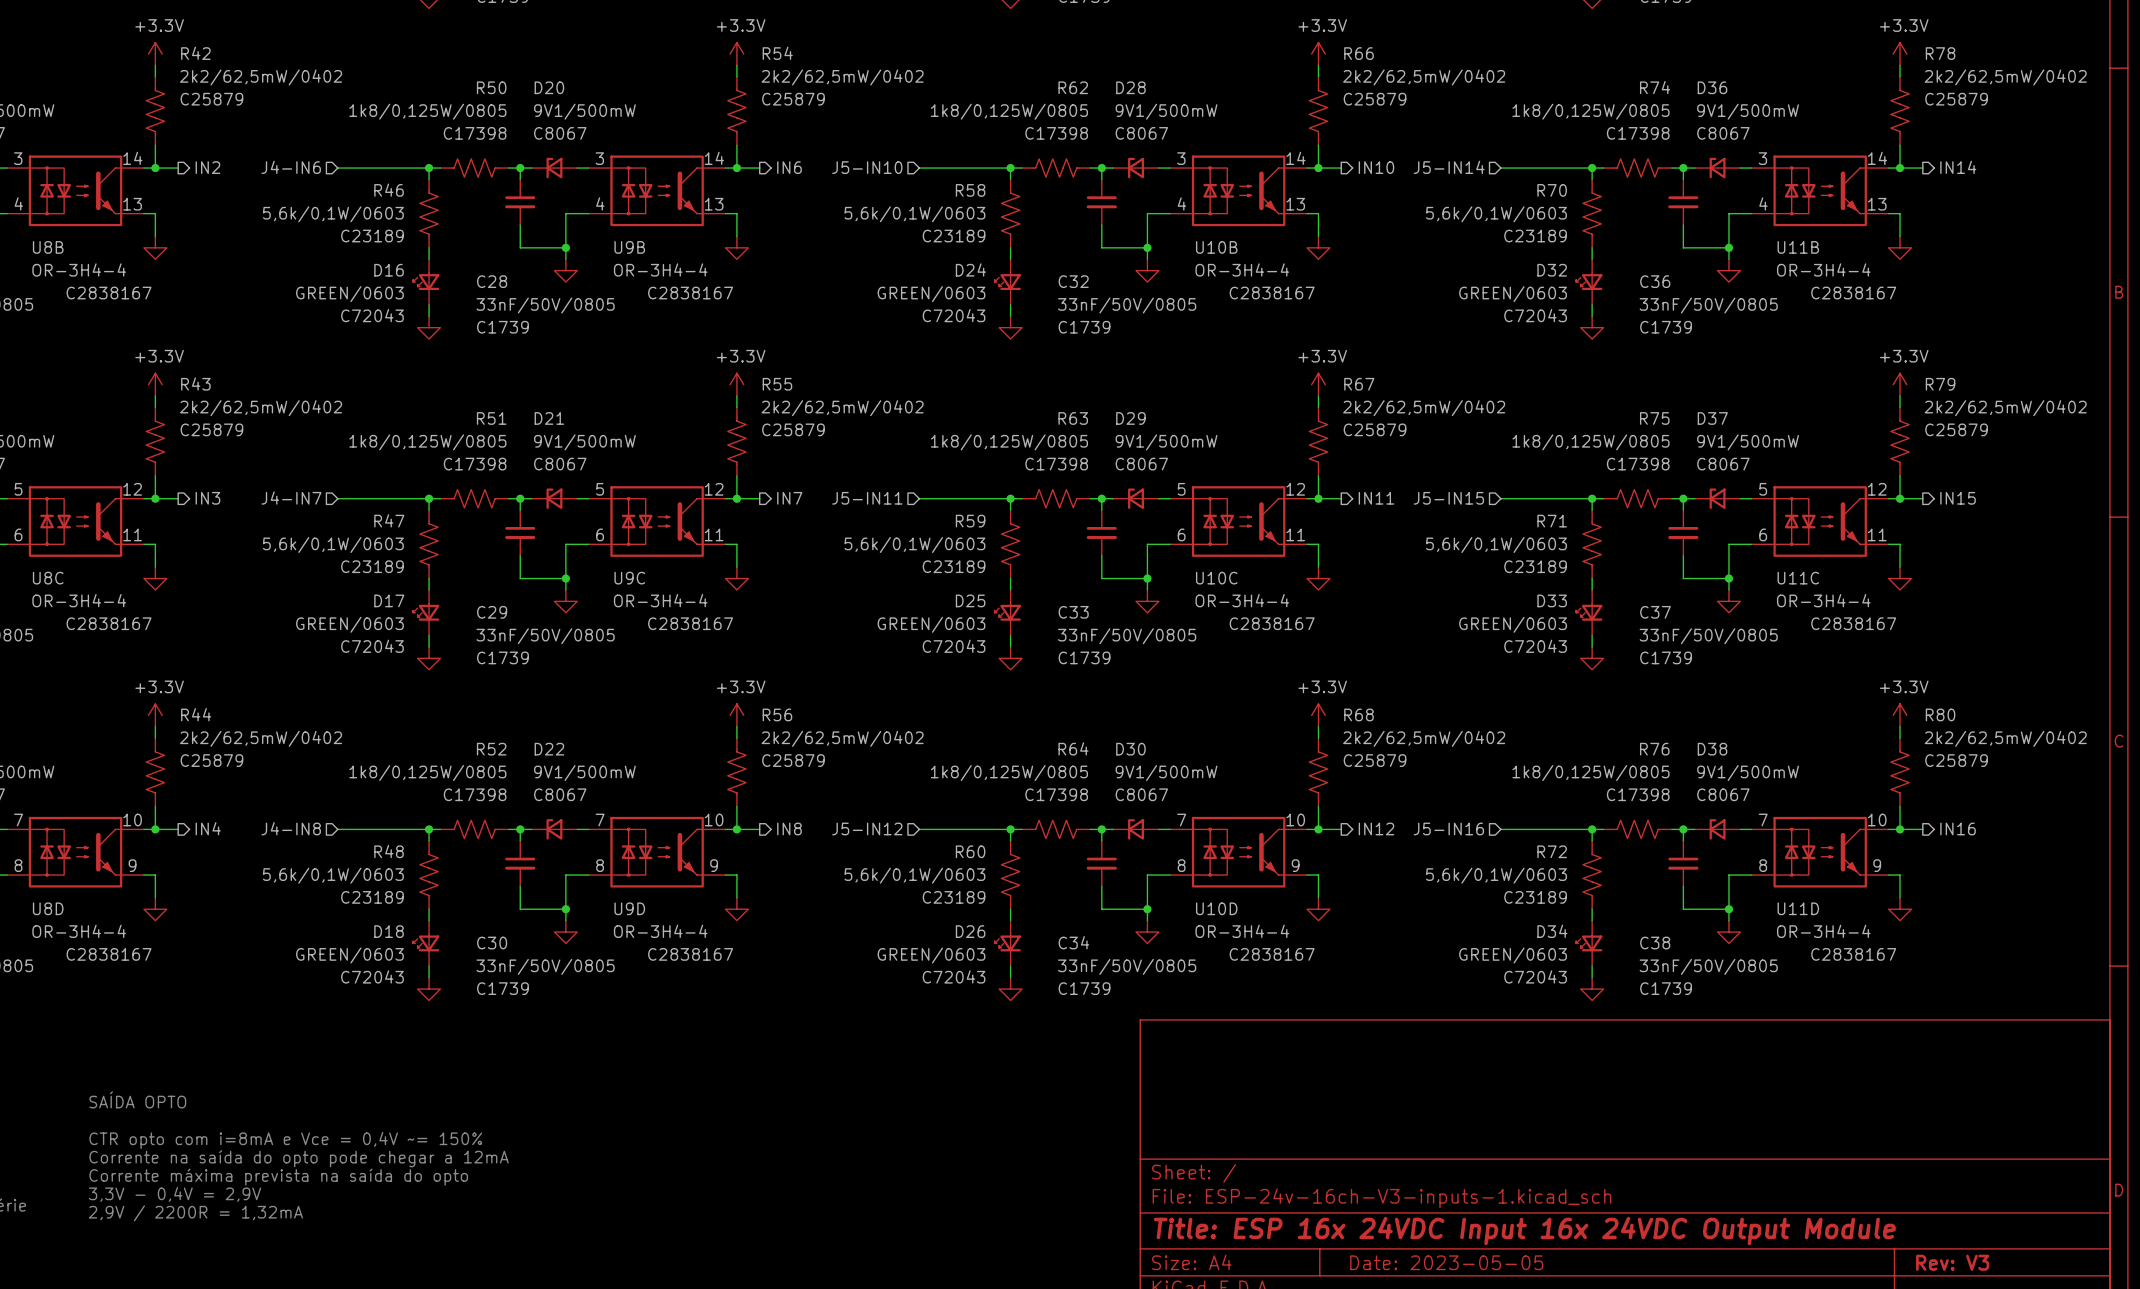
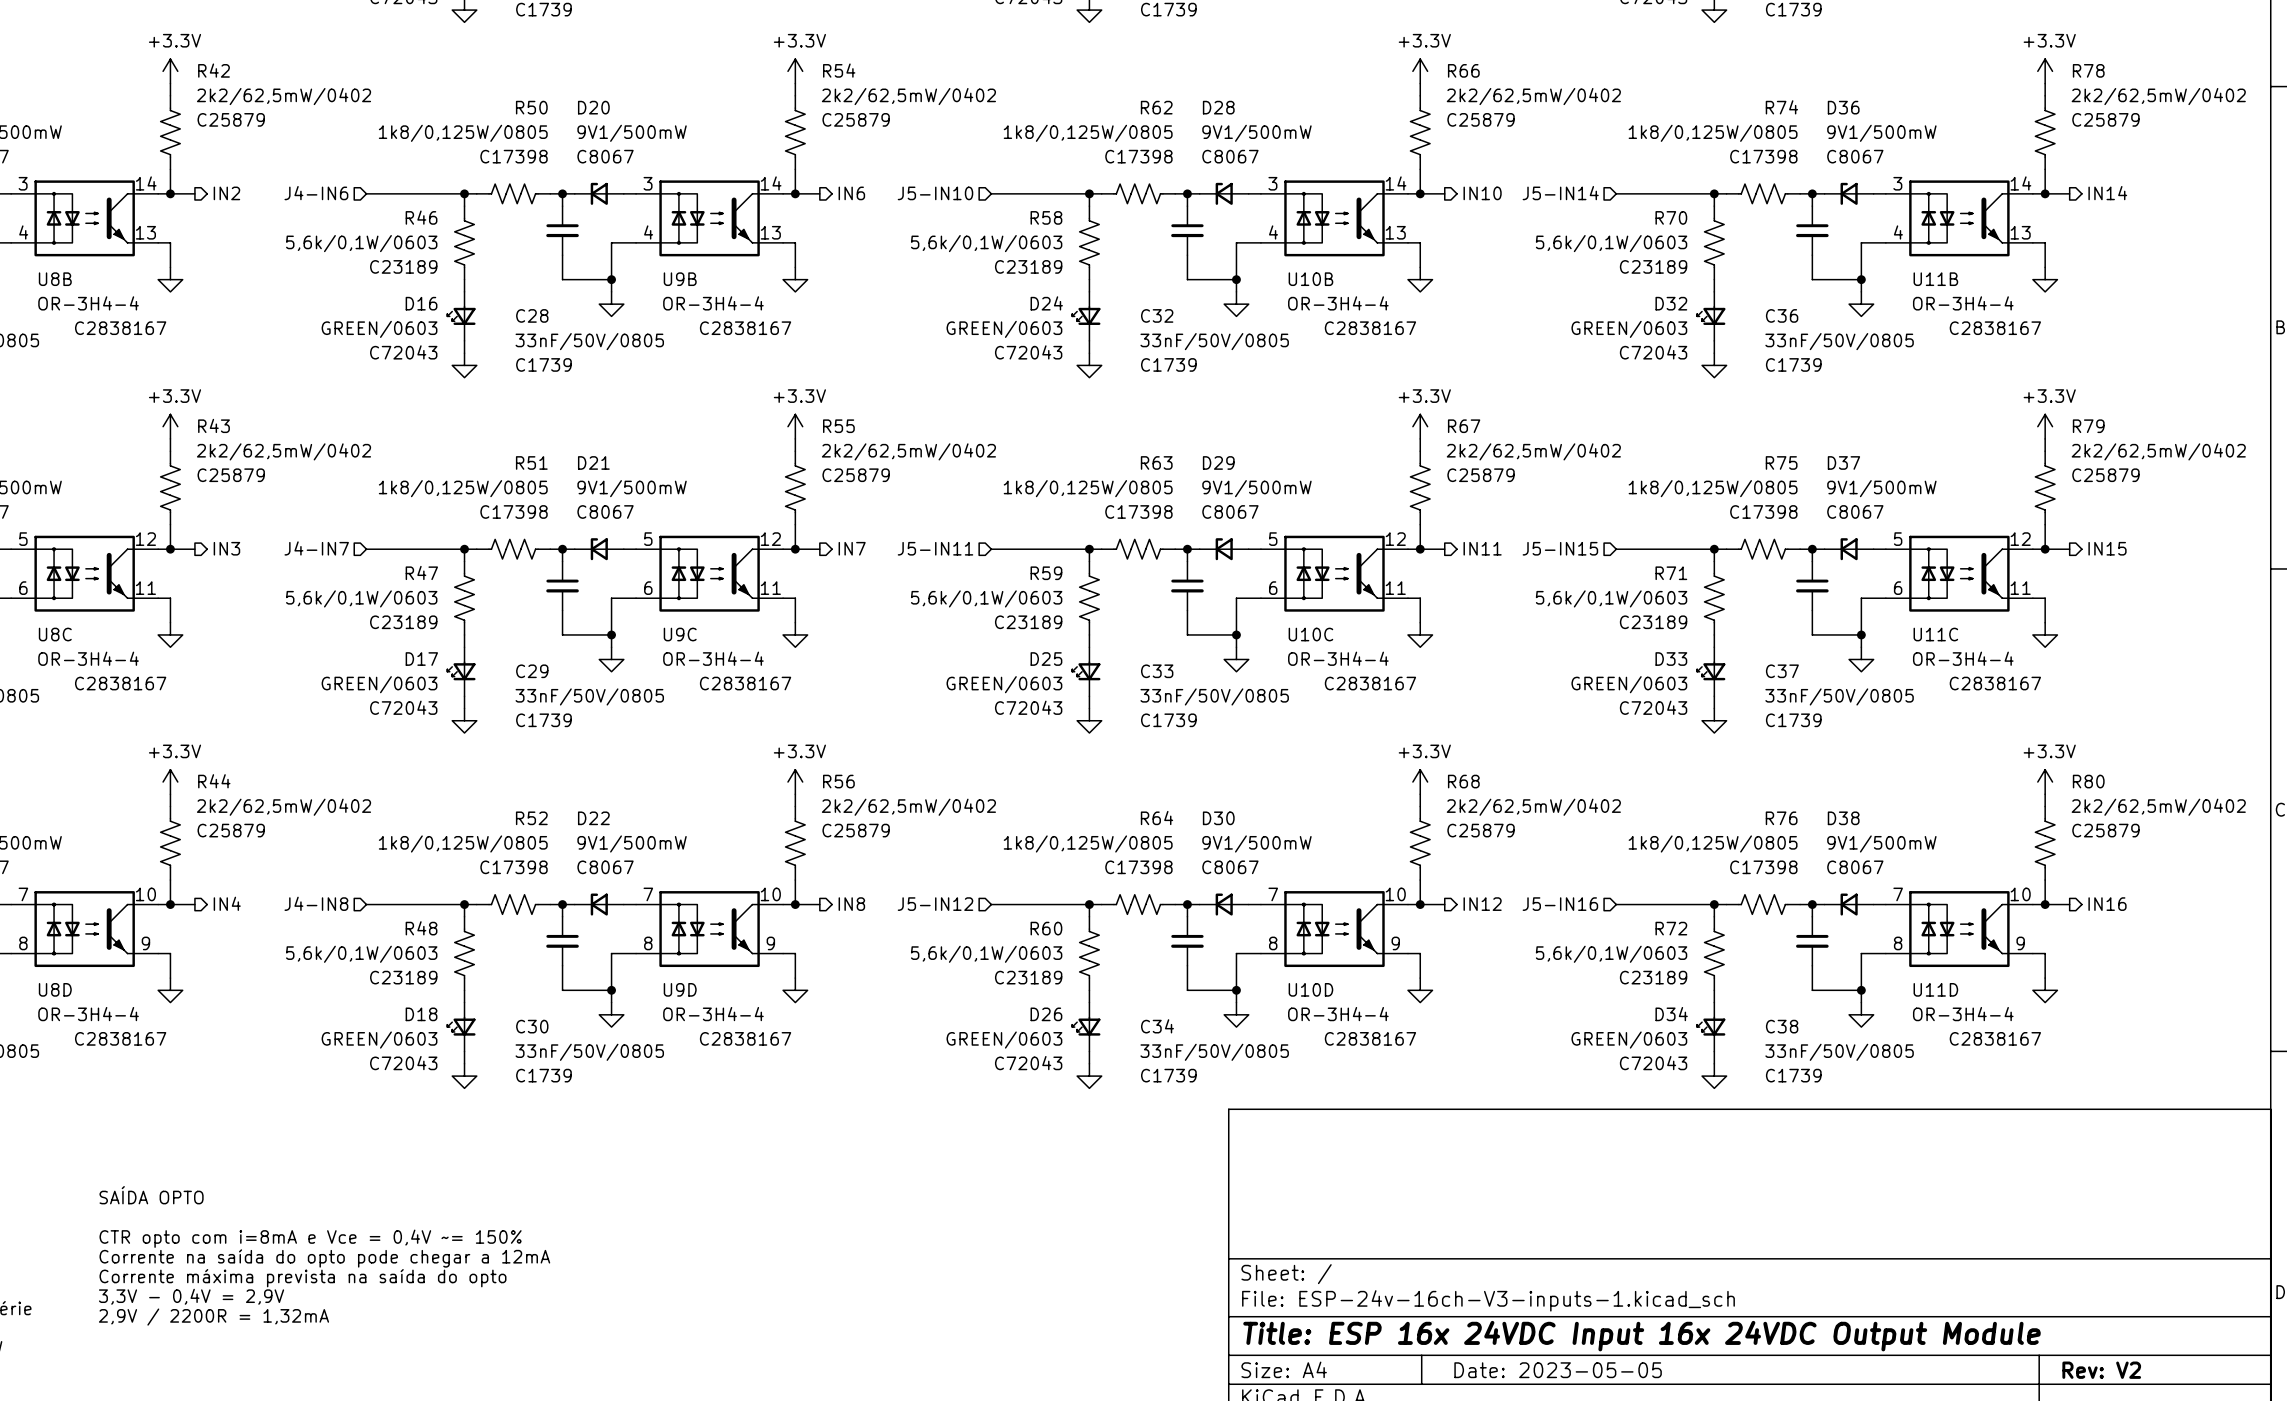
title block: Rev: V3 (1952, 1262) -> Rev: V2 (2101, 1370)

